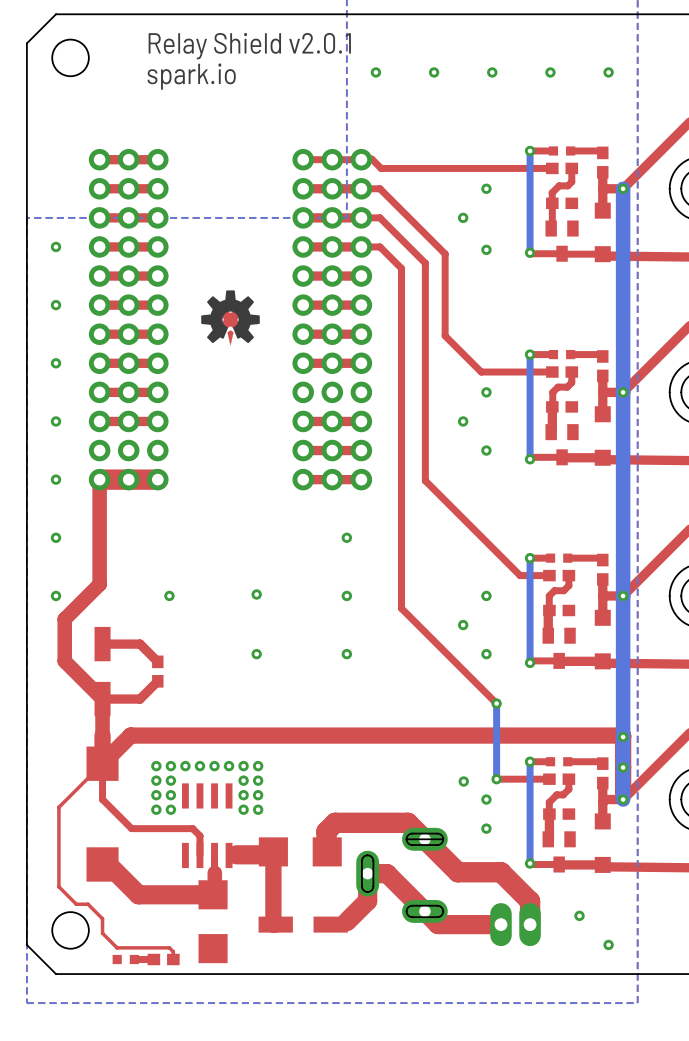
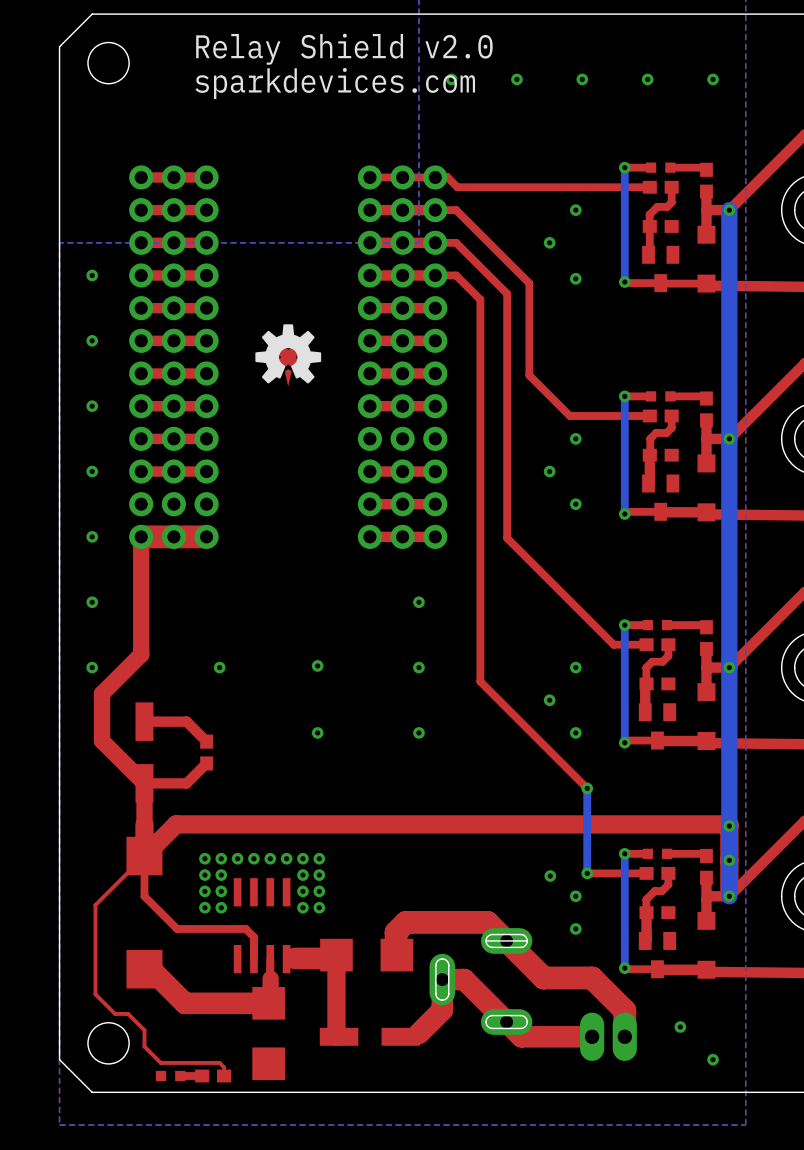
text: Relay Shield v2.0.1 (249, 46) -> Relay Shield v2.0 (344, 49)
text: spark.io (191, 76) -> sparkdevices.com (335, 83)

